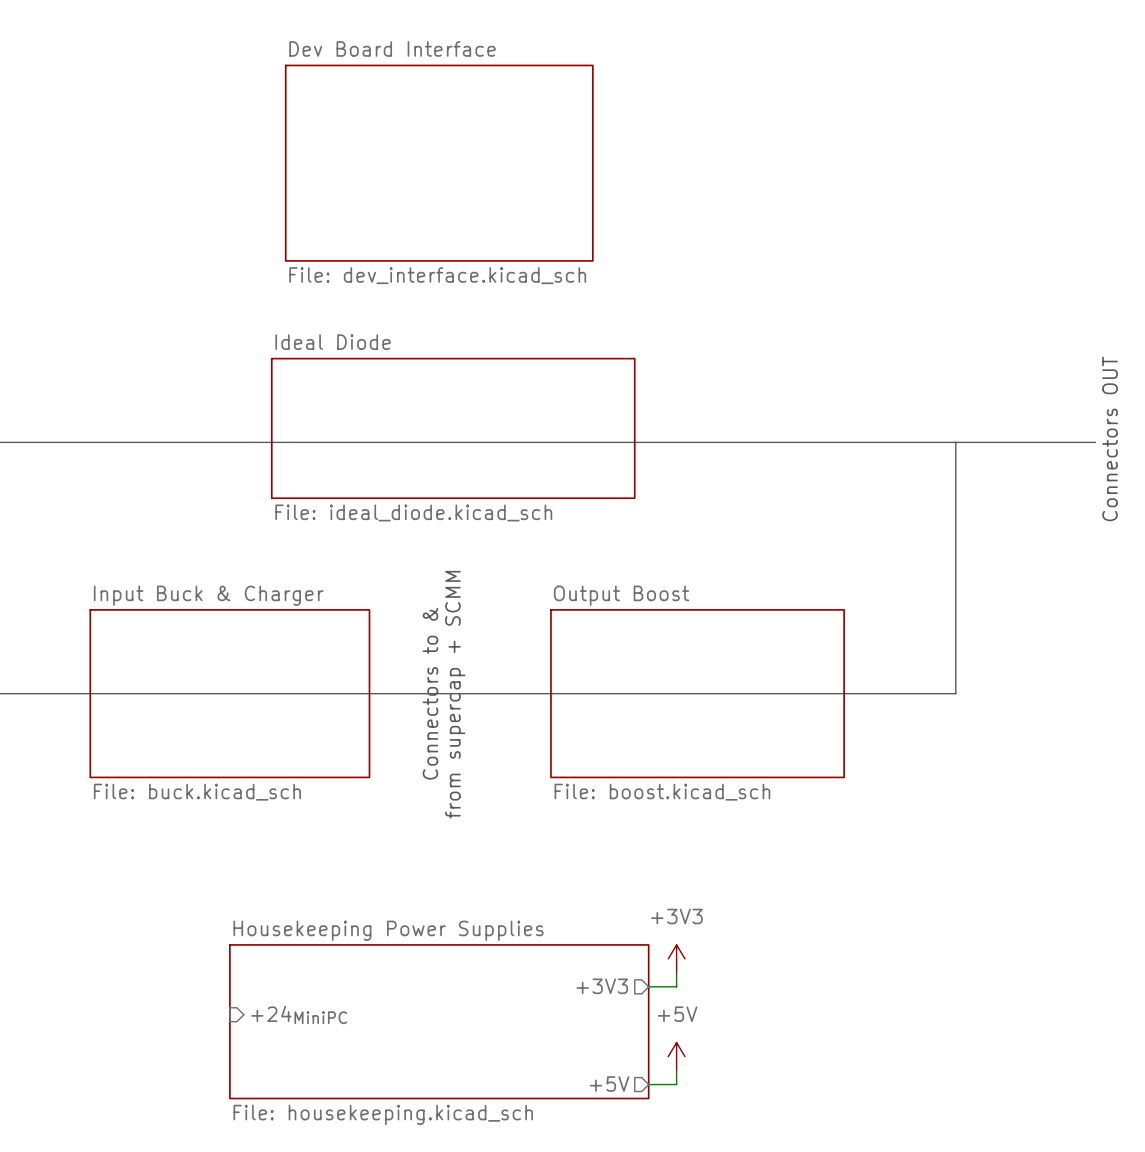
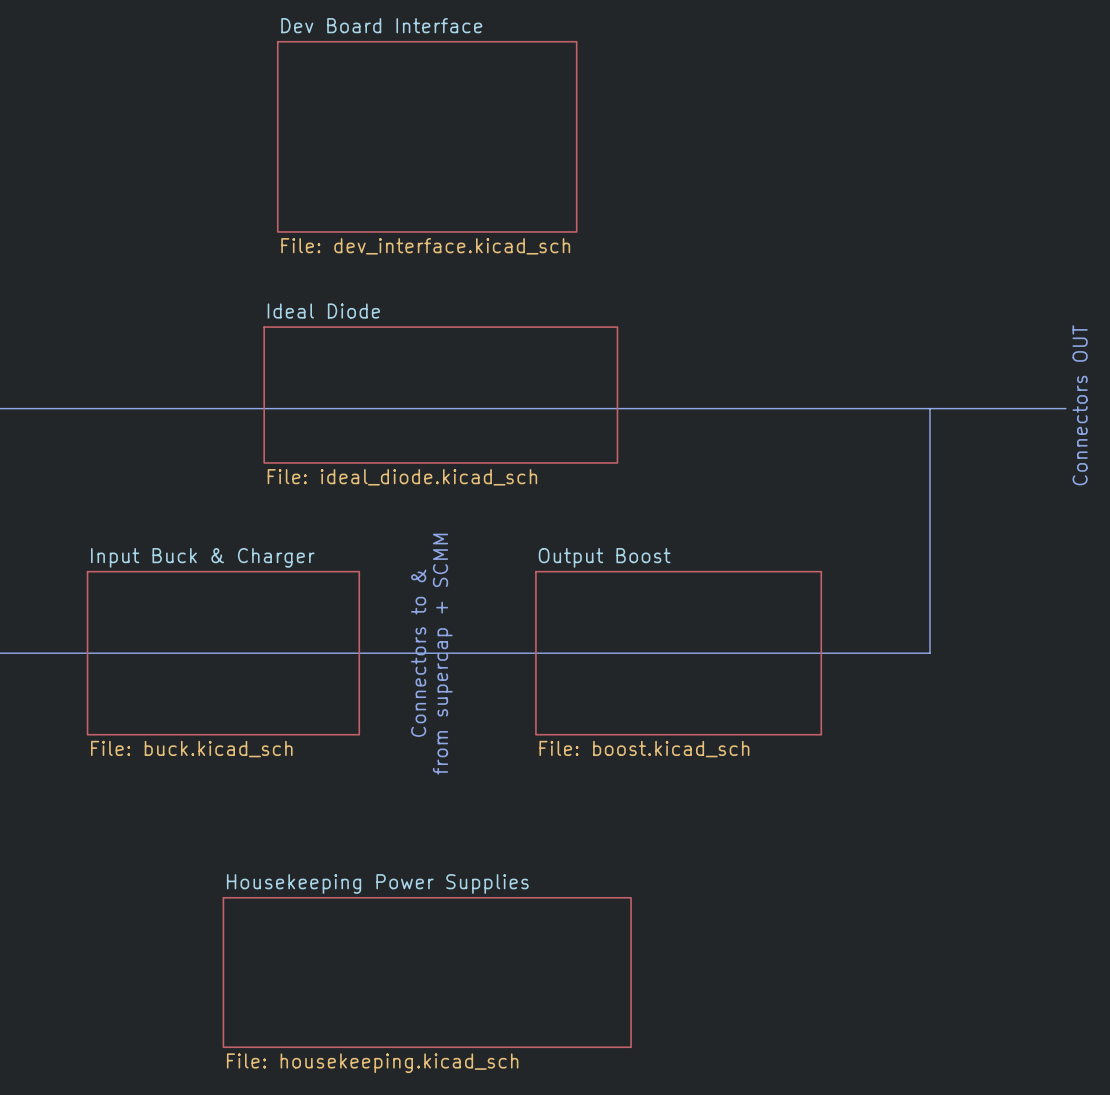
power symbol: +3V3 (676, 958) -> none
wire: (676, 972) (676, 986) (648, 986) -> none
sheet pin: +3V3 (602, 986) -> none
sheet pin: +24MiniPC (299, 1014) -> none
power symbol: +5V (676, 1056) -> none
wire: (676, 1070) (676, 1084) (648, 1084) -> none
sheet pin: +5V (609, 1084) -> none

